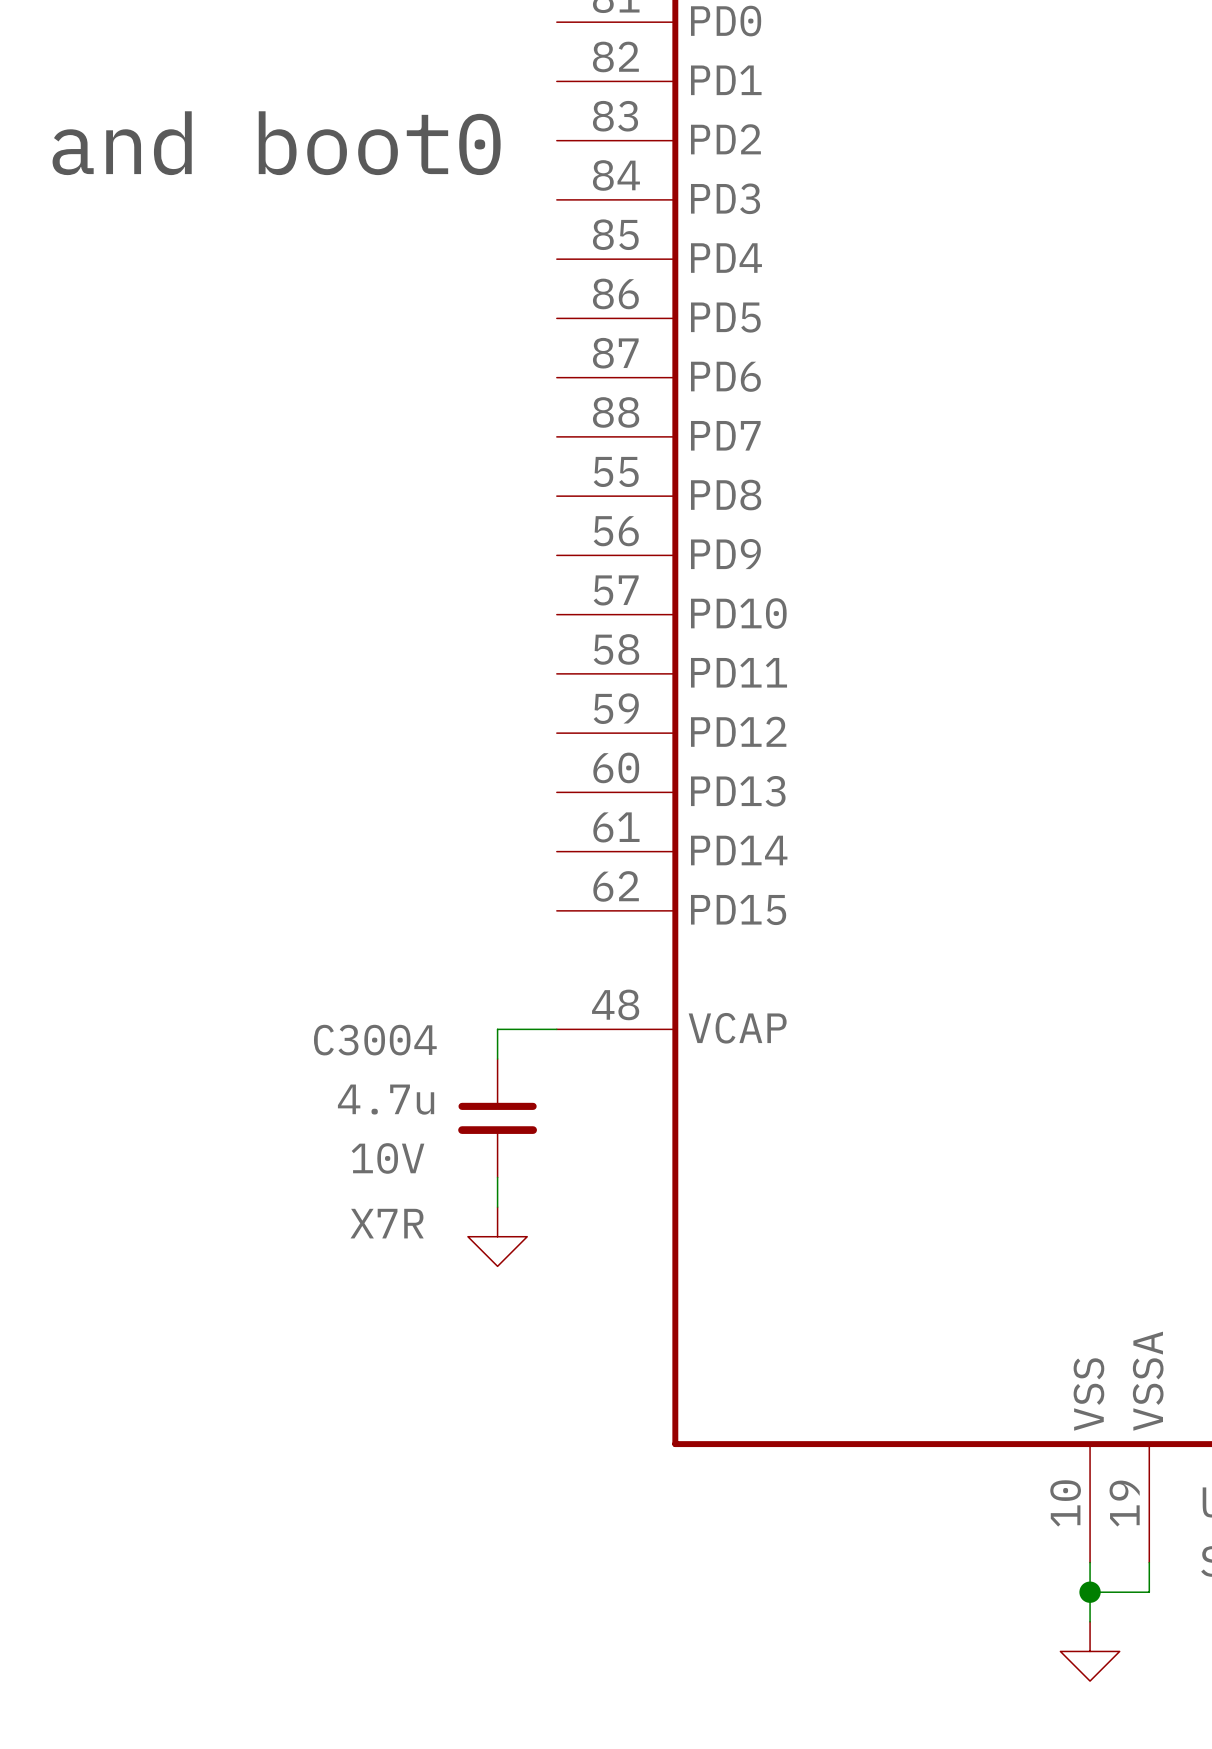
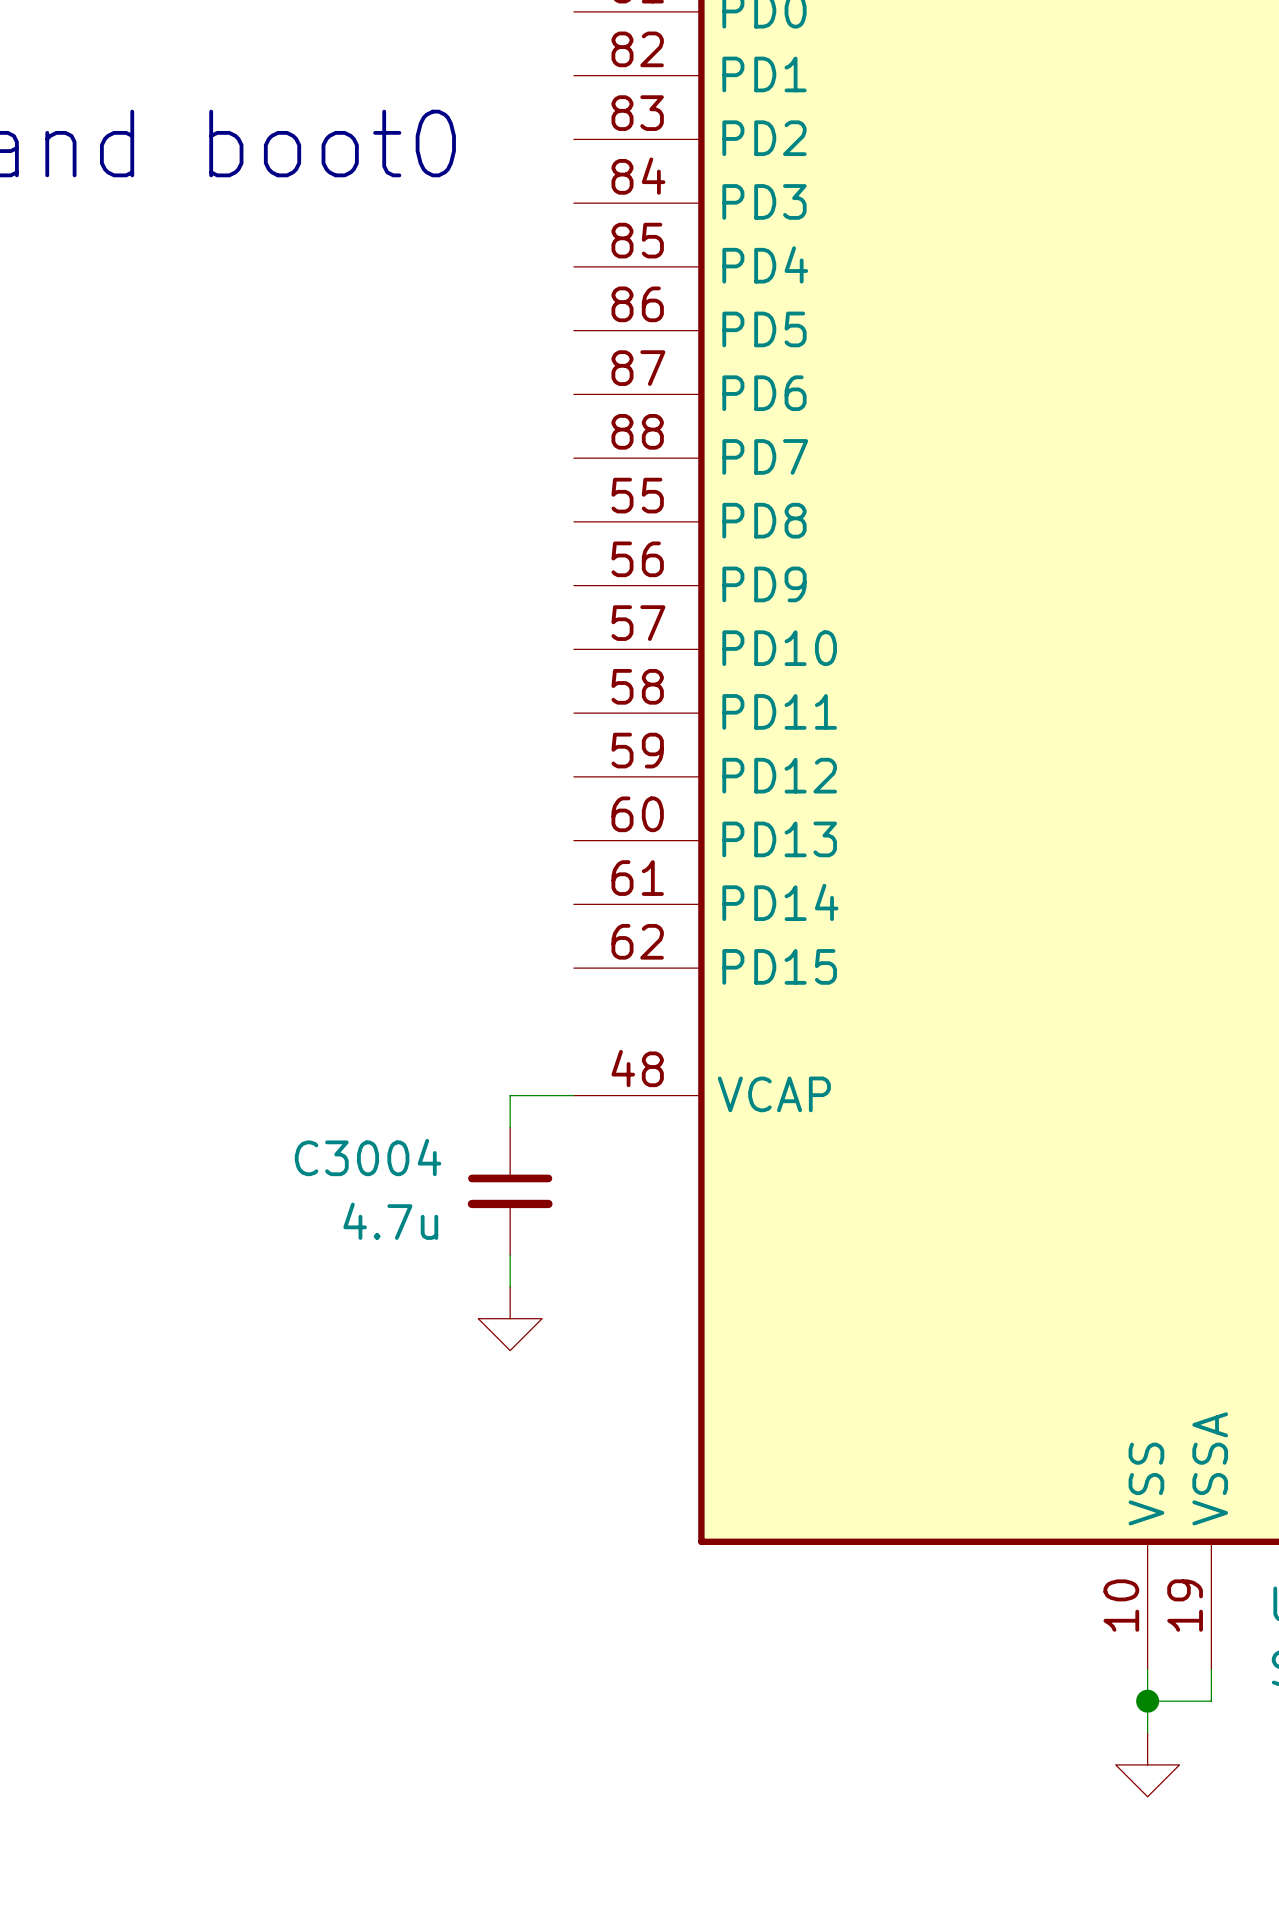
C3004 name position: C3004 (375, 1040) -> C3004 (368, 1157)
C3004 value position: 4.7u (386, 1099) -> 4.7u (390, 1221)
C3004 text: 10V (388, 1158) -> none
C3004 text: X7R (387, 1223) -> none

